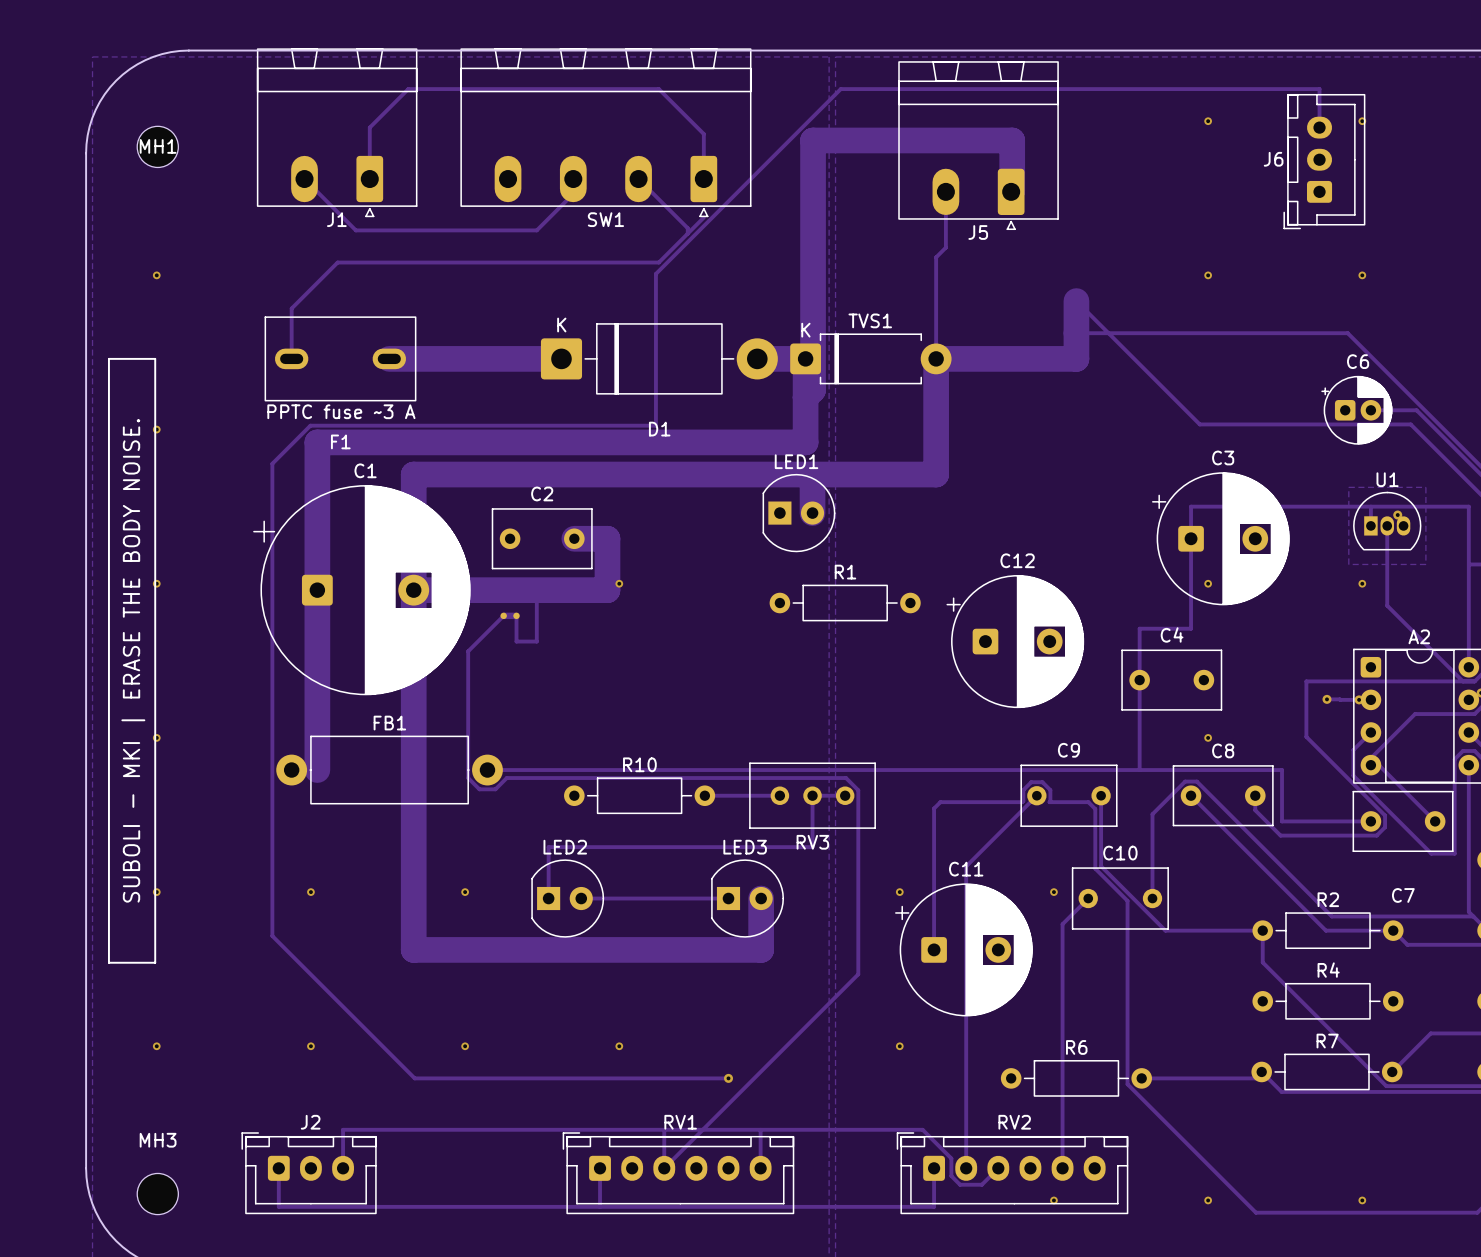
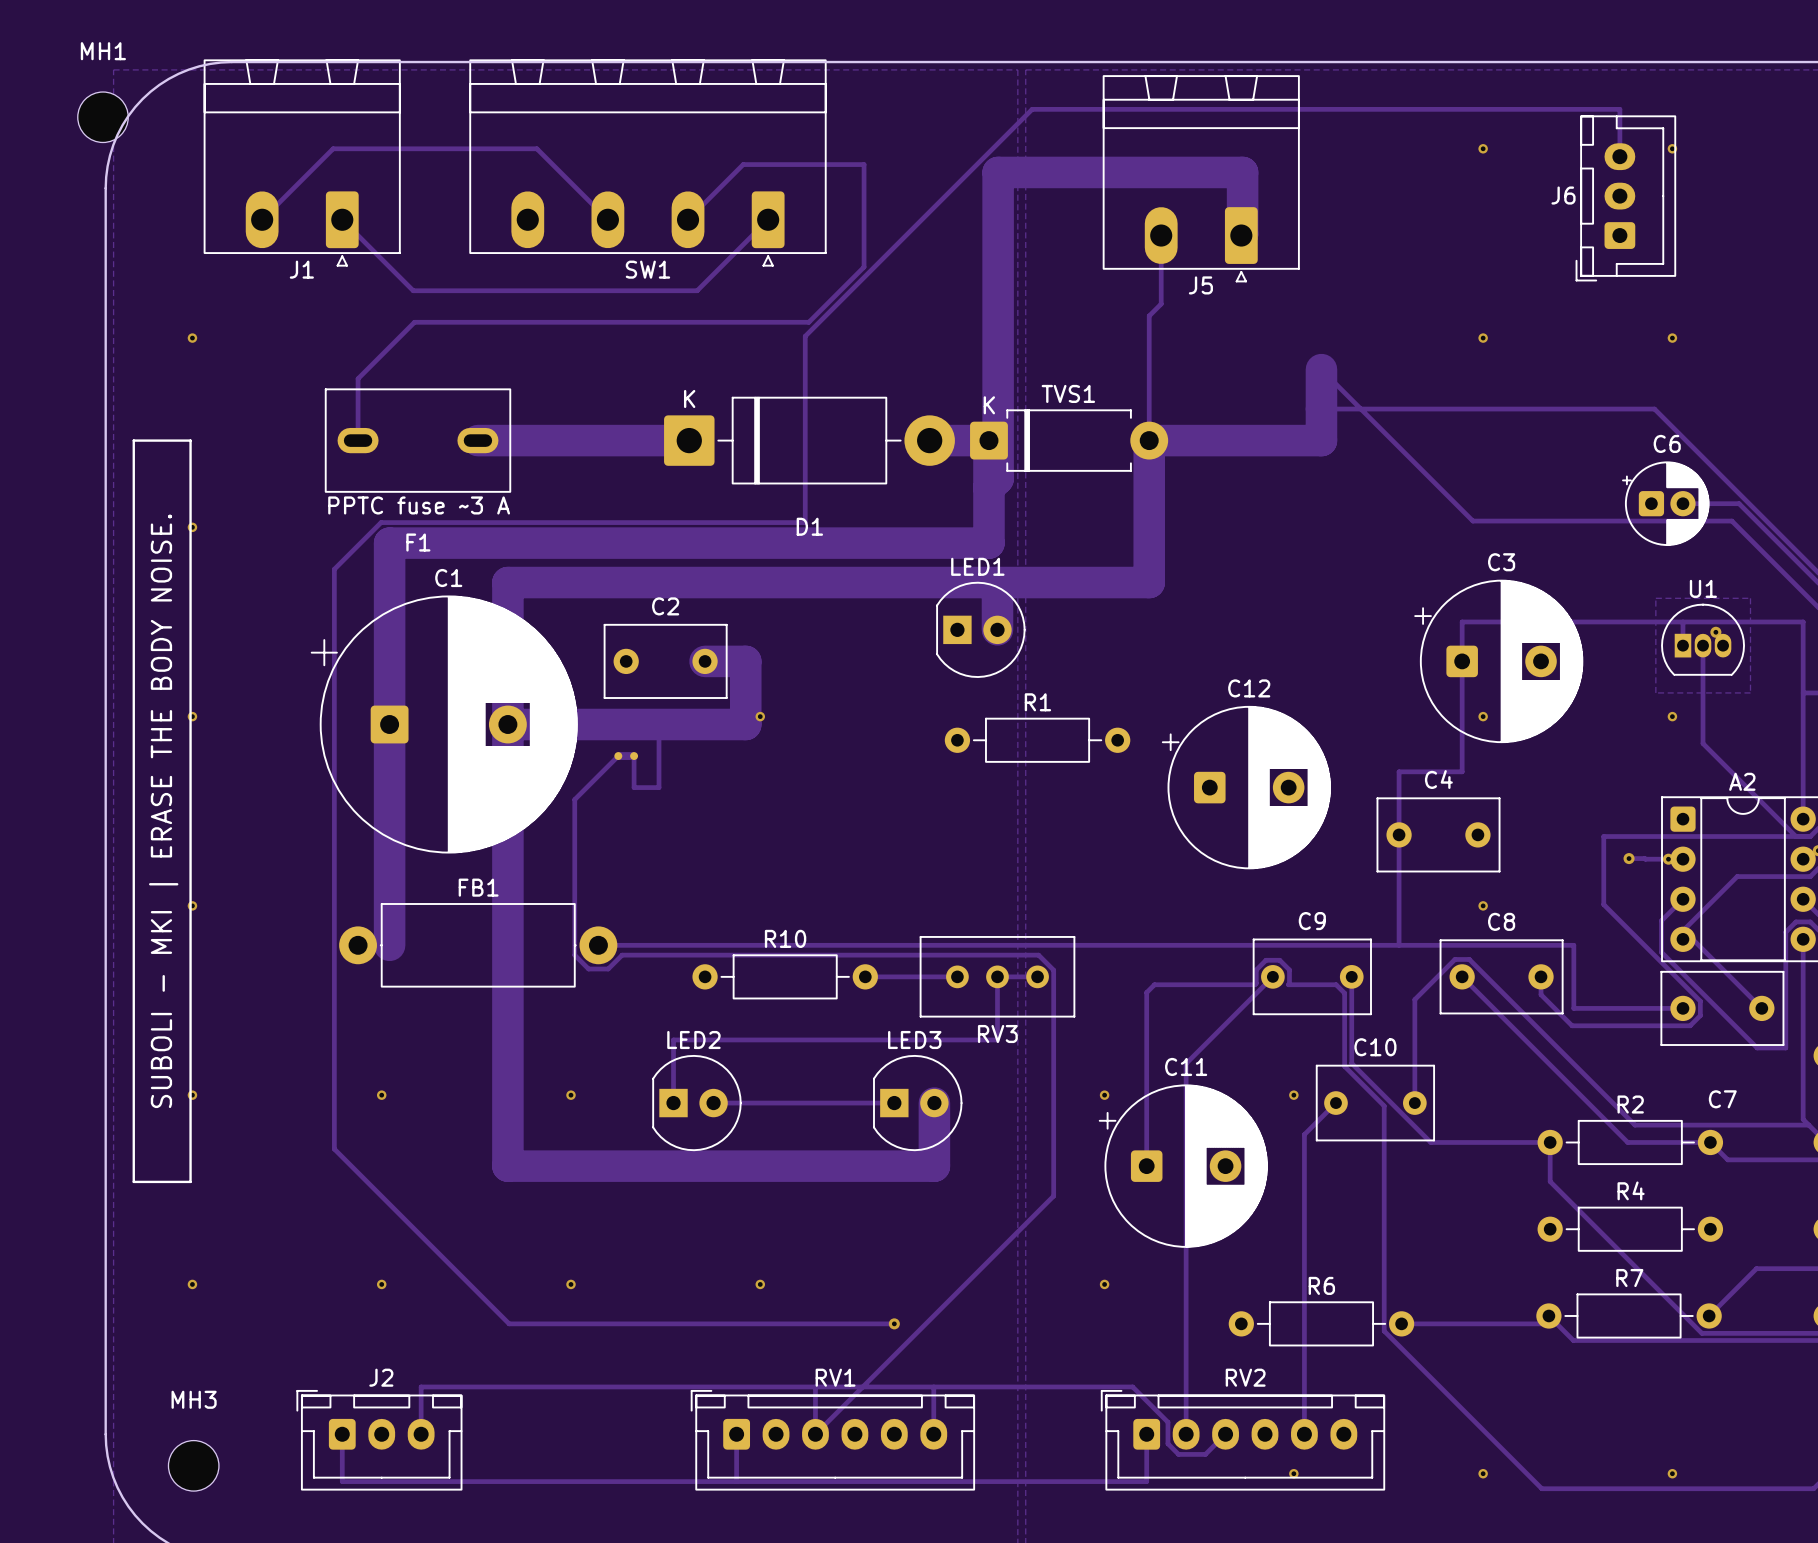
J1 position: (337, 132) -> (302, 162)
SW1 position: (605, 132) -> (647, 162)
track: (703, 134) (658, 89) (408, 89) (369, 127) (369, 179) -> (864, 164) (743, 164) (688, 219)
MH1 position: (157, 146) -> (103, 117)
MH1 name position: MH1 (158, 146) -> MH1 (103, 51)
track: none -> (262, 219) (333, 148) (536, 148) (607, 219)
track: none -> (342, 219) (413, 290) (697, 290) (768, 219)
track: (304, 179) (355, 230) (536, 230) (573, 193) (573, 179) -> none
track: (638, 179) (687, 228) (687, 233) -> none
track: none -> (864, 219) (864, 267)

